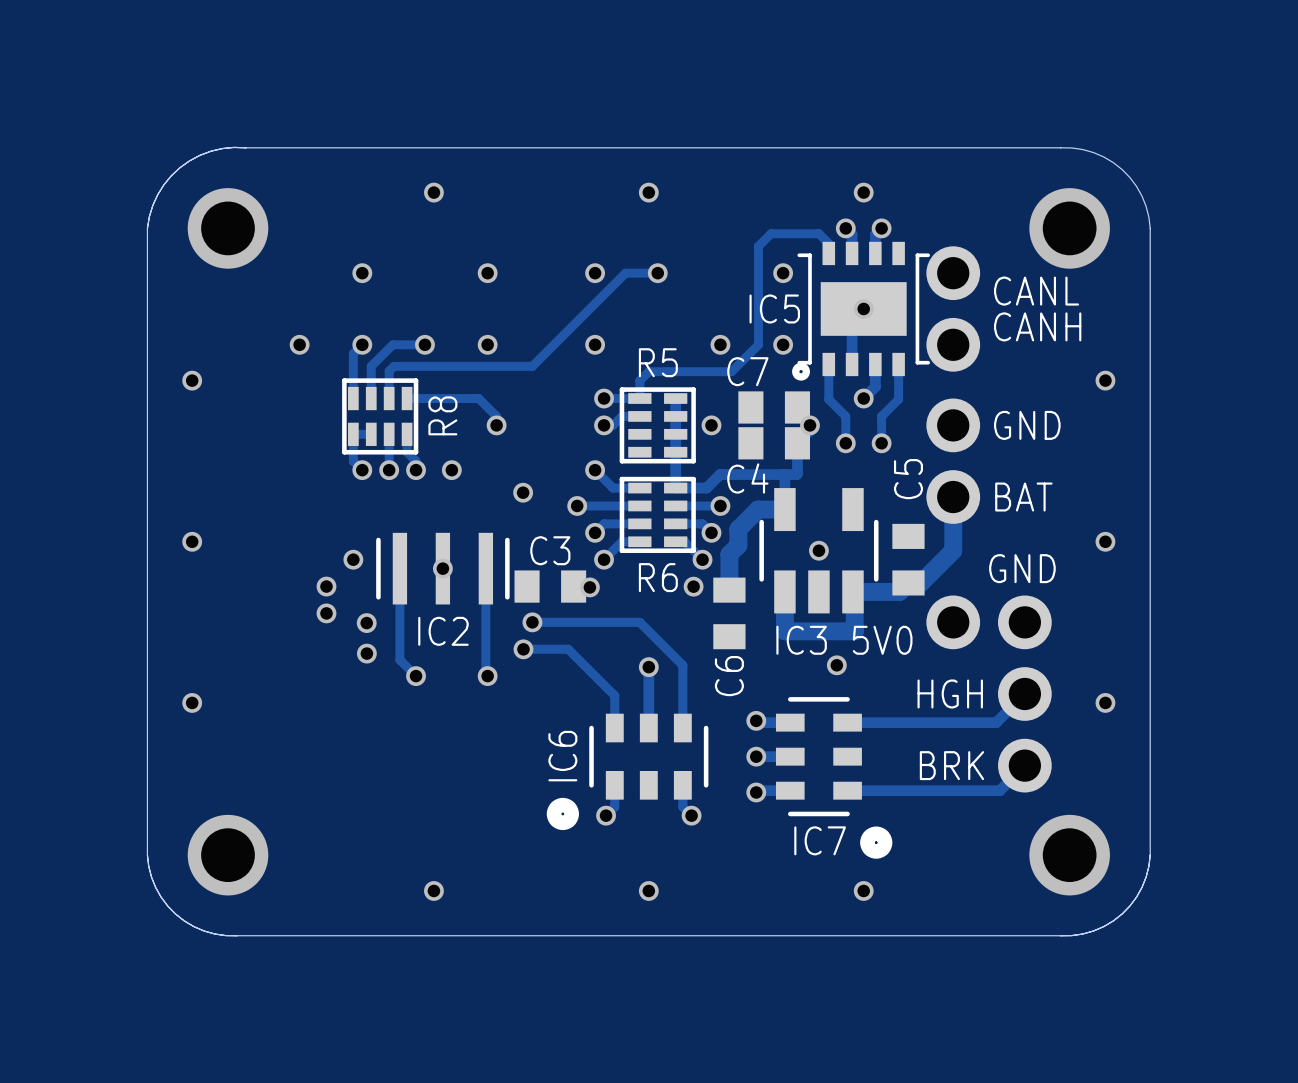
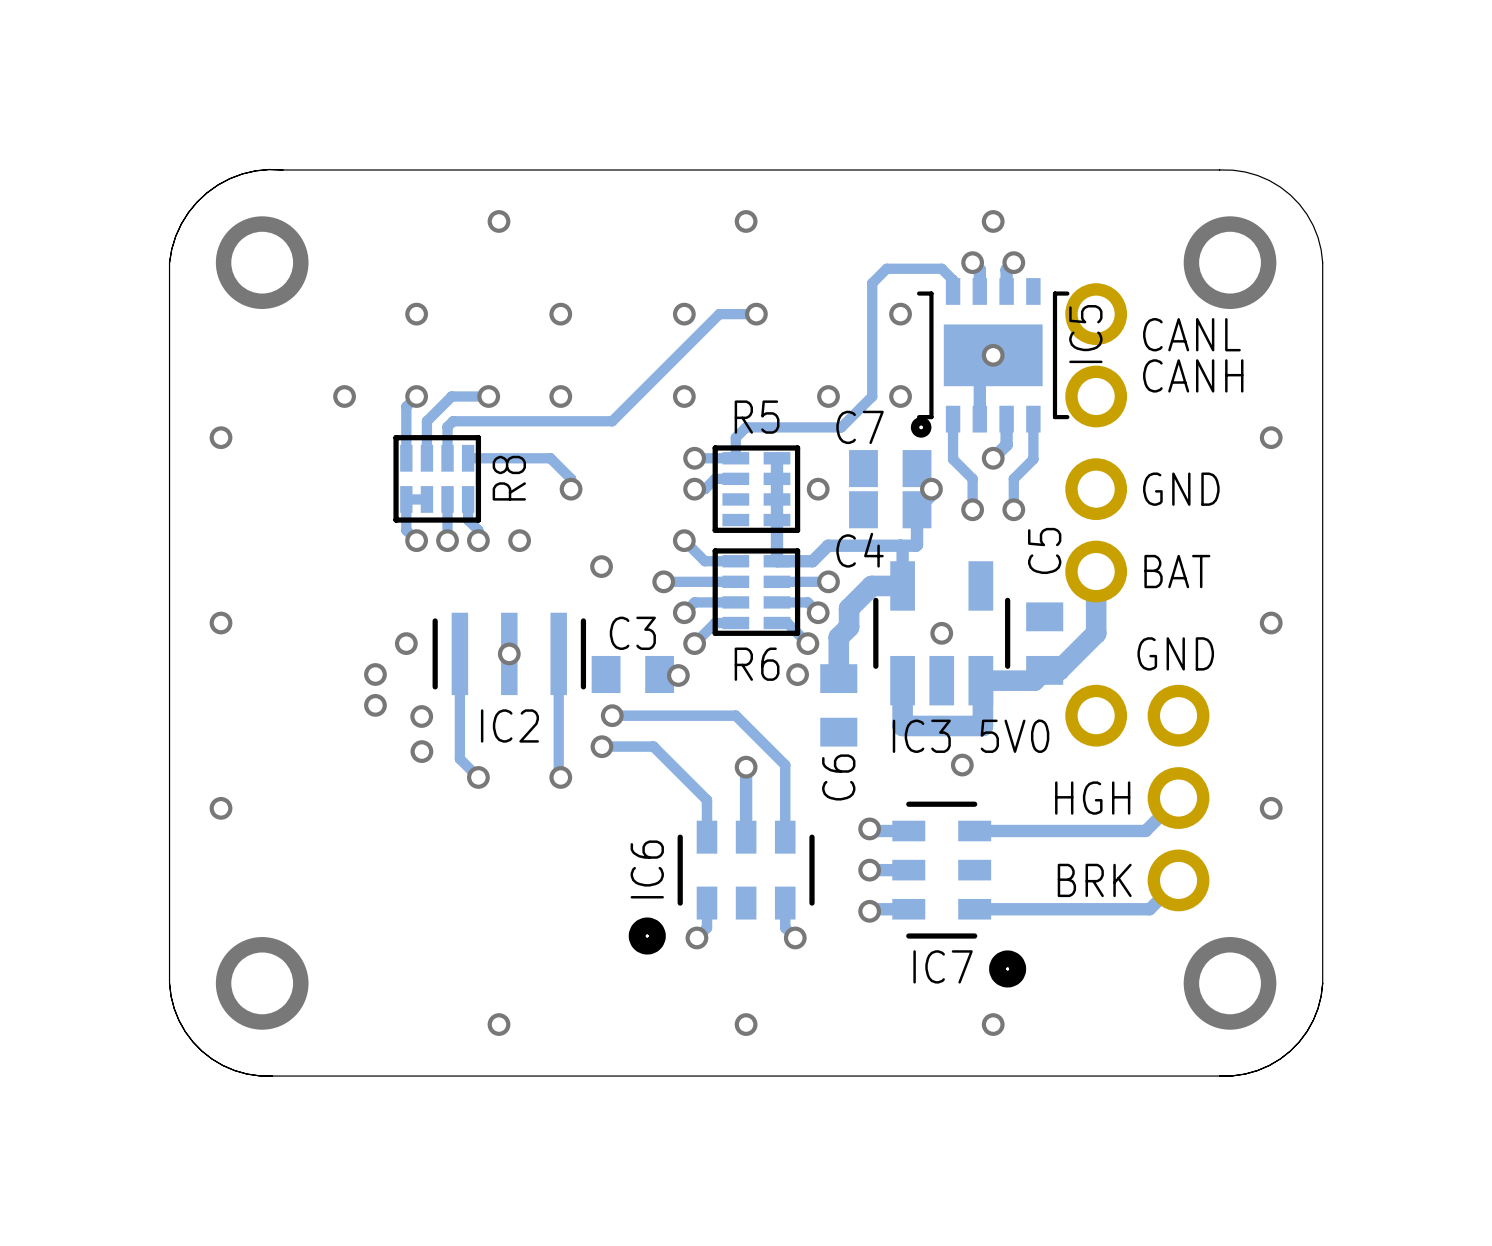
IC5 name rotation: 0° (774, 308) -> 90° counterclockwise (1085, 334)
IC5 name position: IC5 (774, 308) -> IC5 (1085, 334)

